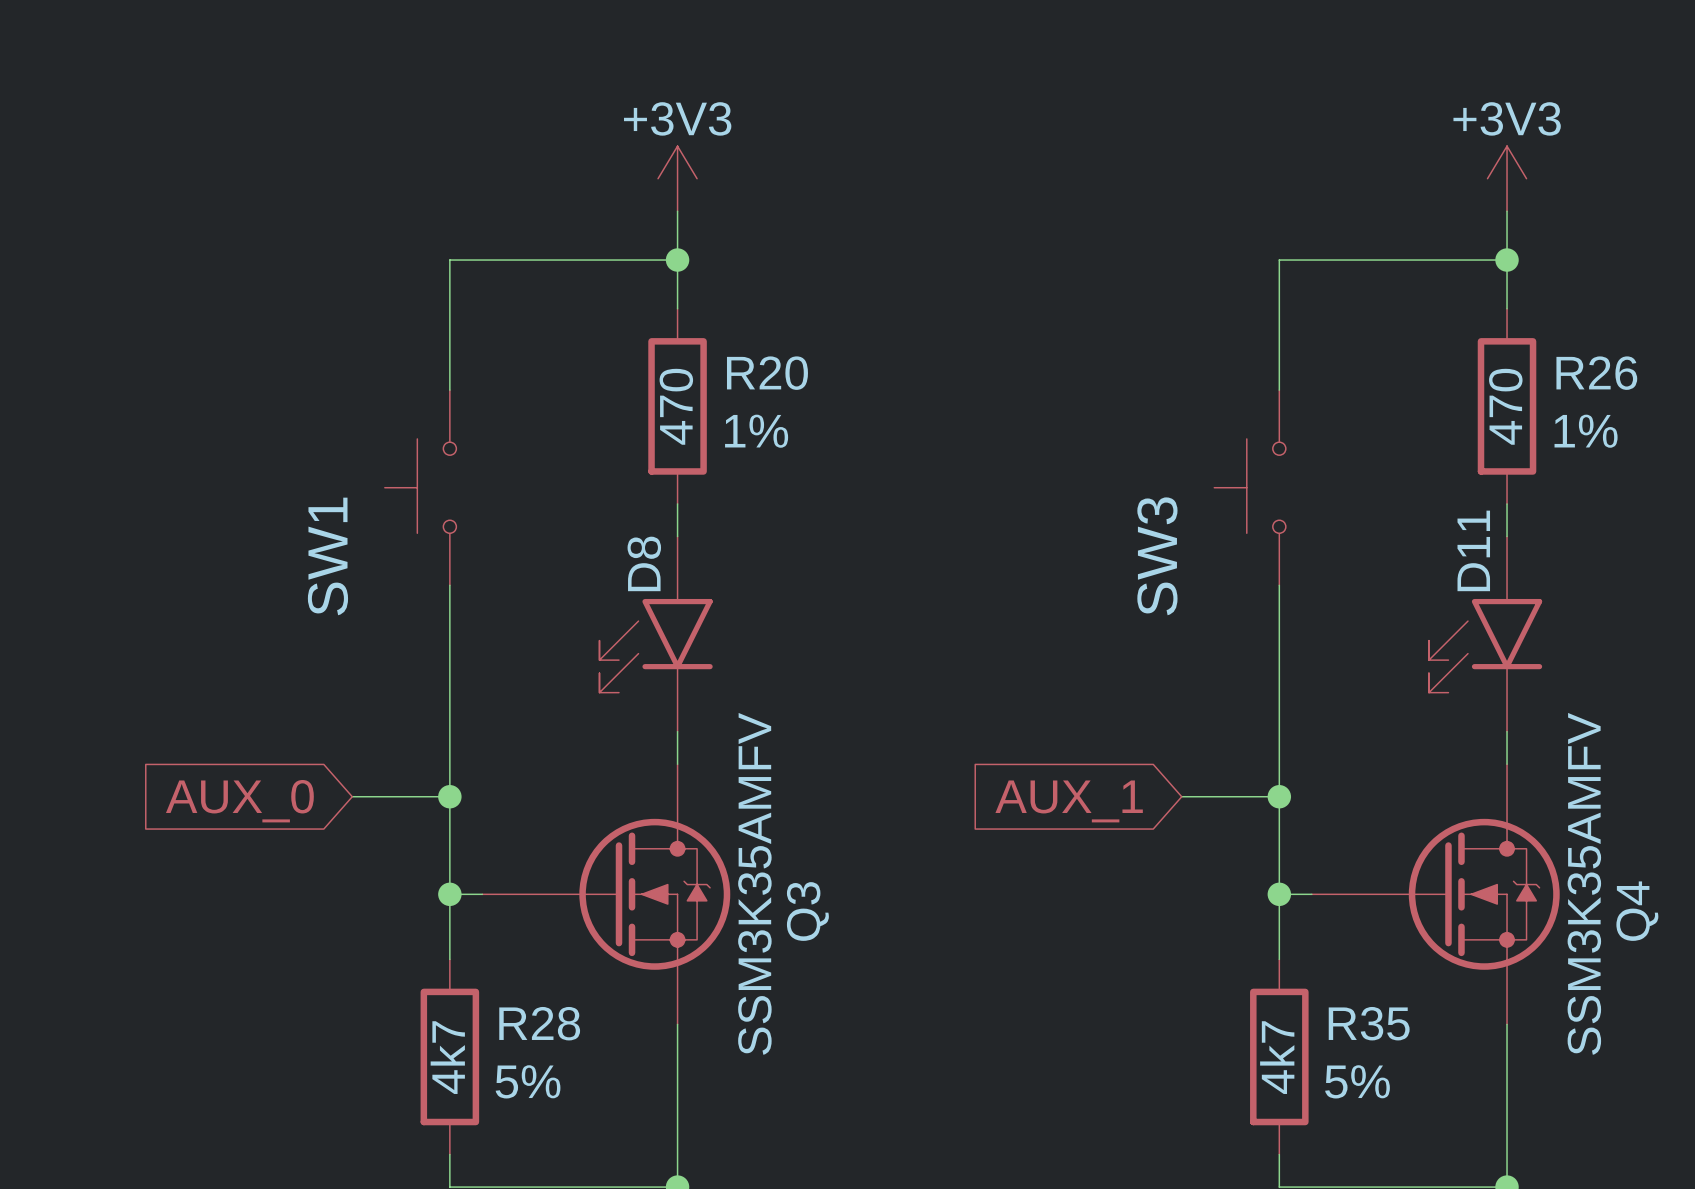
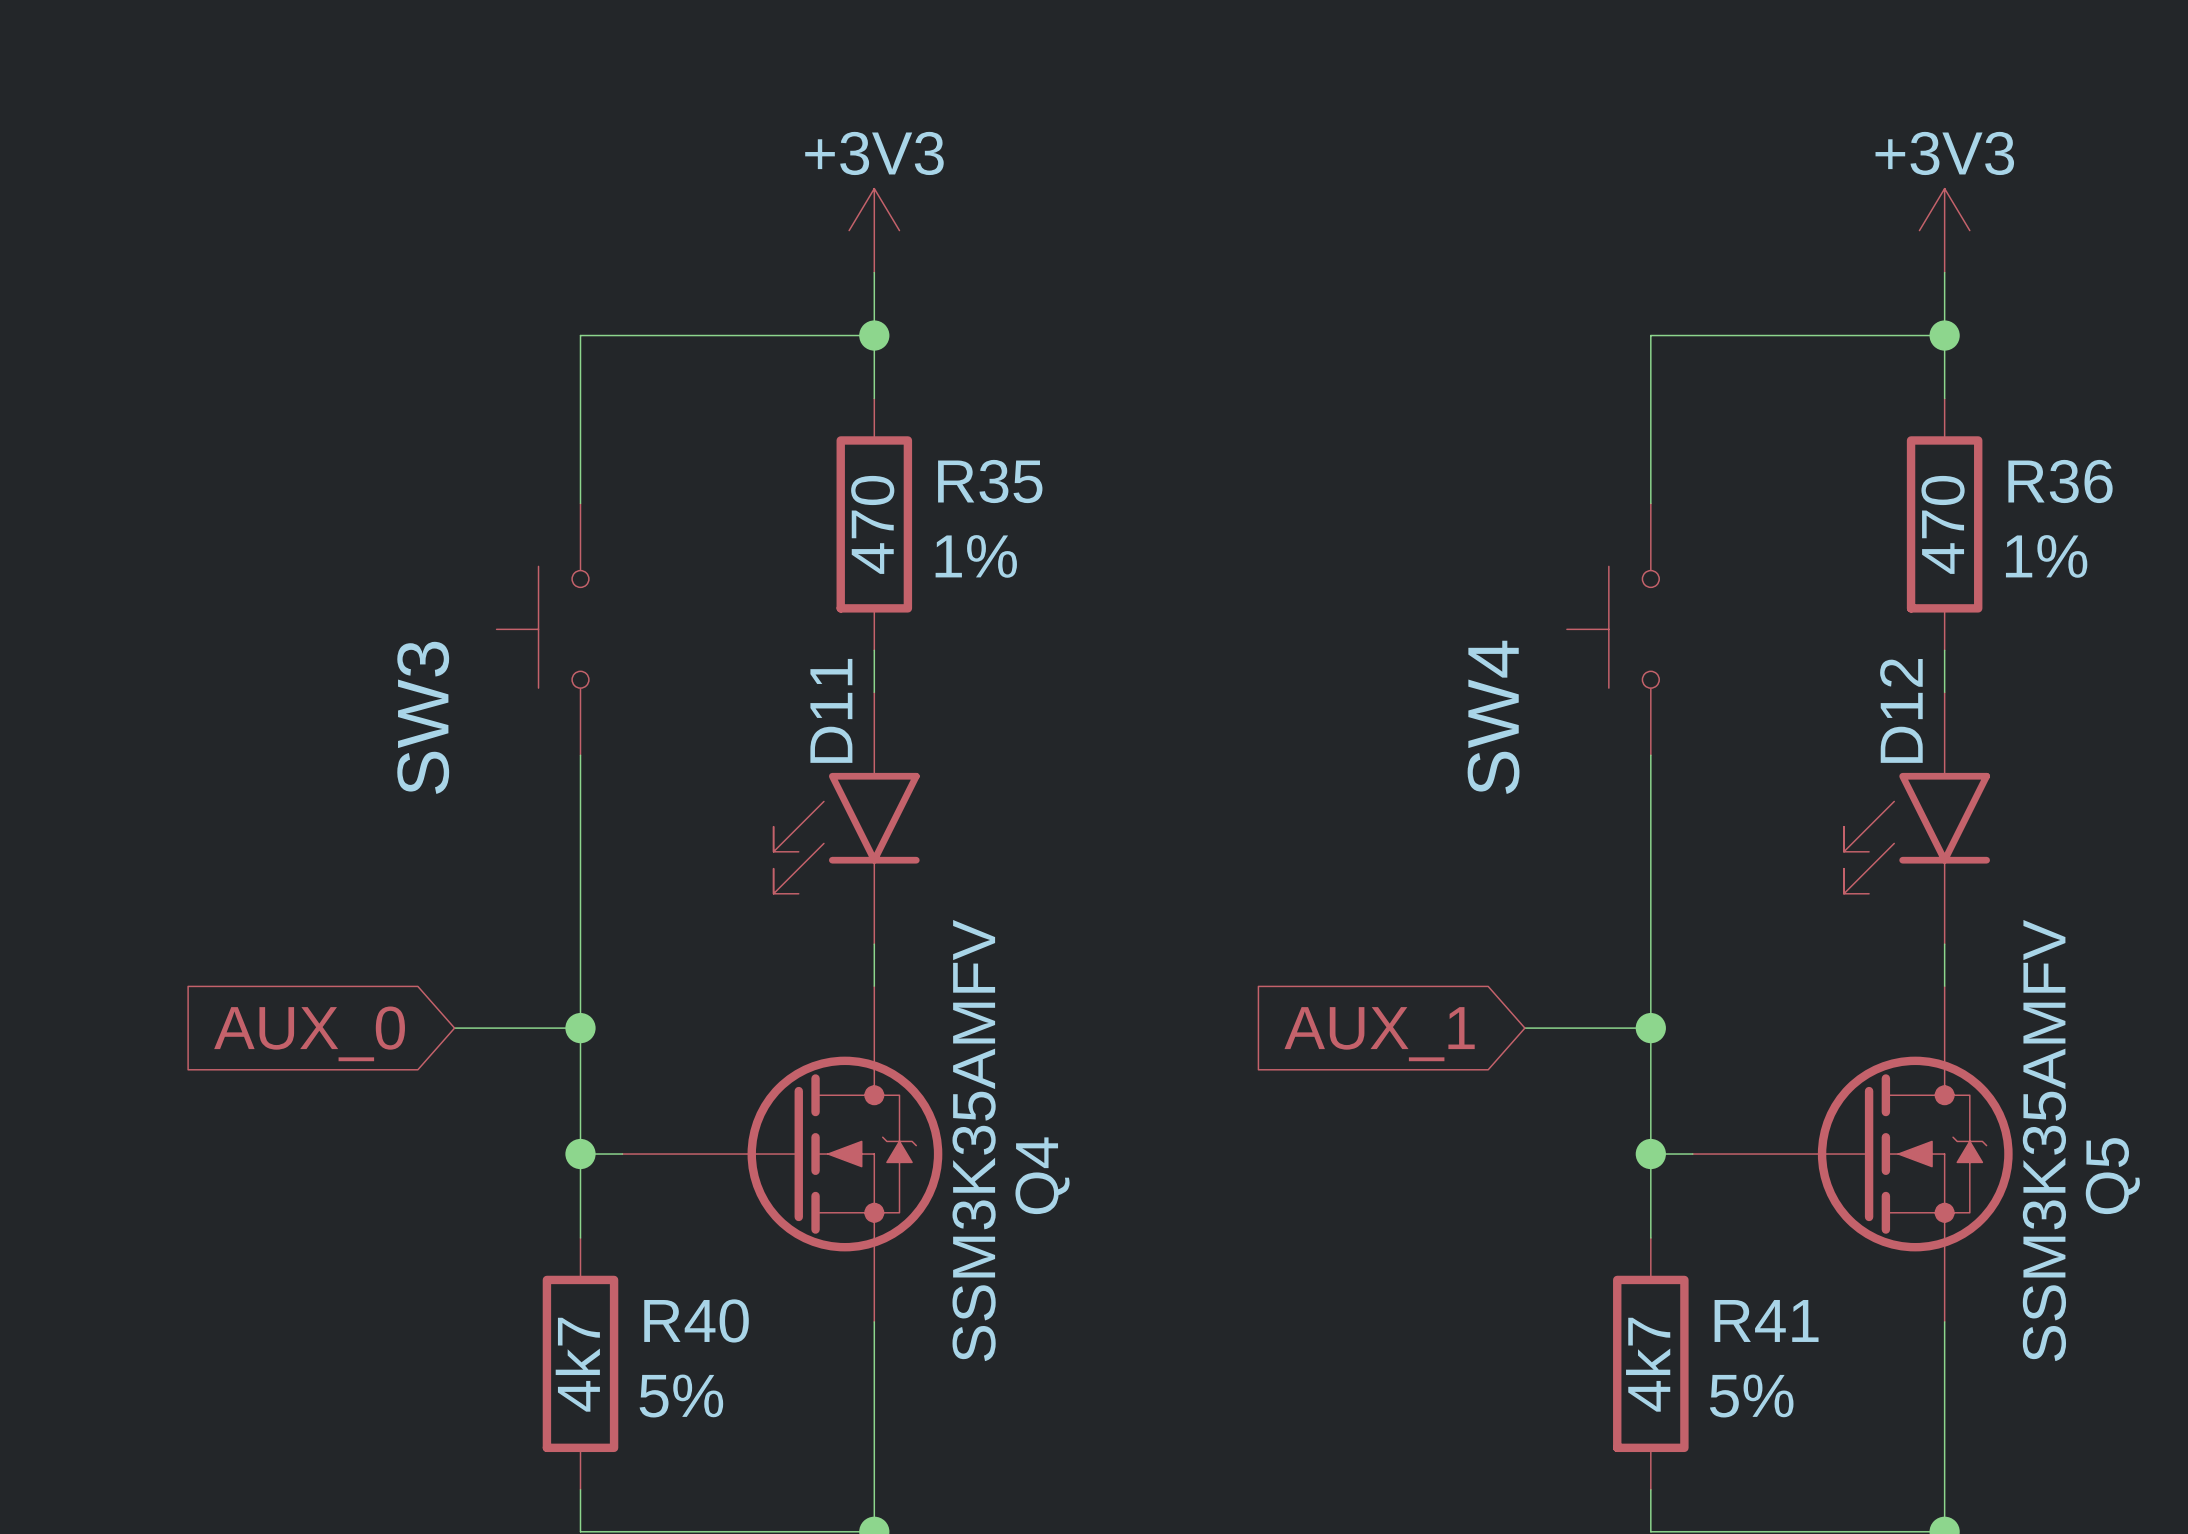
R20 name: R20 (767, 373) -> R35 (990, 481)
R26 name: R26 (1596, 373) -> R36 (2060, 481)
D11 name: D11 (1473, 550) -> D12 (1901, 710)
SW1 name: SW1 (327, 556) -> SW3 (423, 717)
SW3 name: SW3 (1157, 556) -> SW4 (1493, 717)
D8 name: D8 (644, 563) -> D11 (831, 710)
Q3 name: Q3 (807, 911) -> Q4 (1042, 1175)
Q4 name: Q4 (1637, 911) -> Q5 (2112, 1176)
R28 name: R28 (539, 1023) -> R40 (696, 1320)
R35 name: R35 (1369, 1023) -> R41 (1766, 1320)

